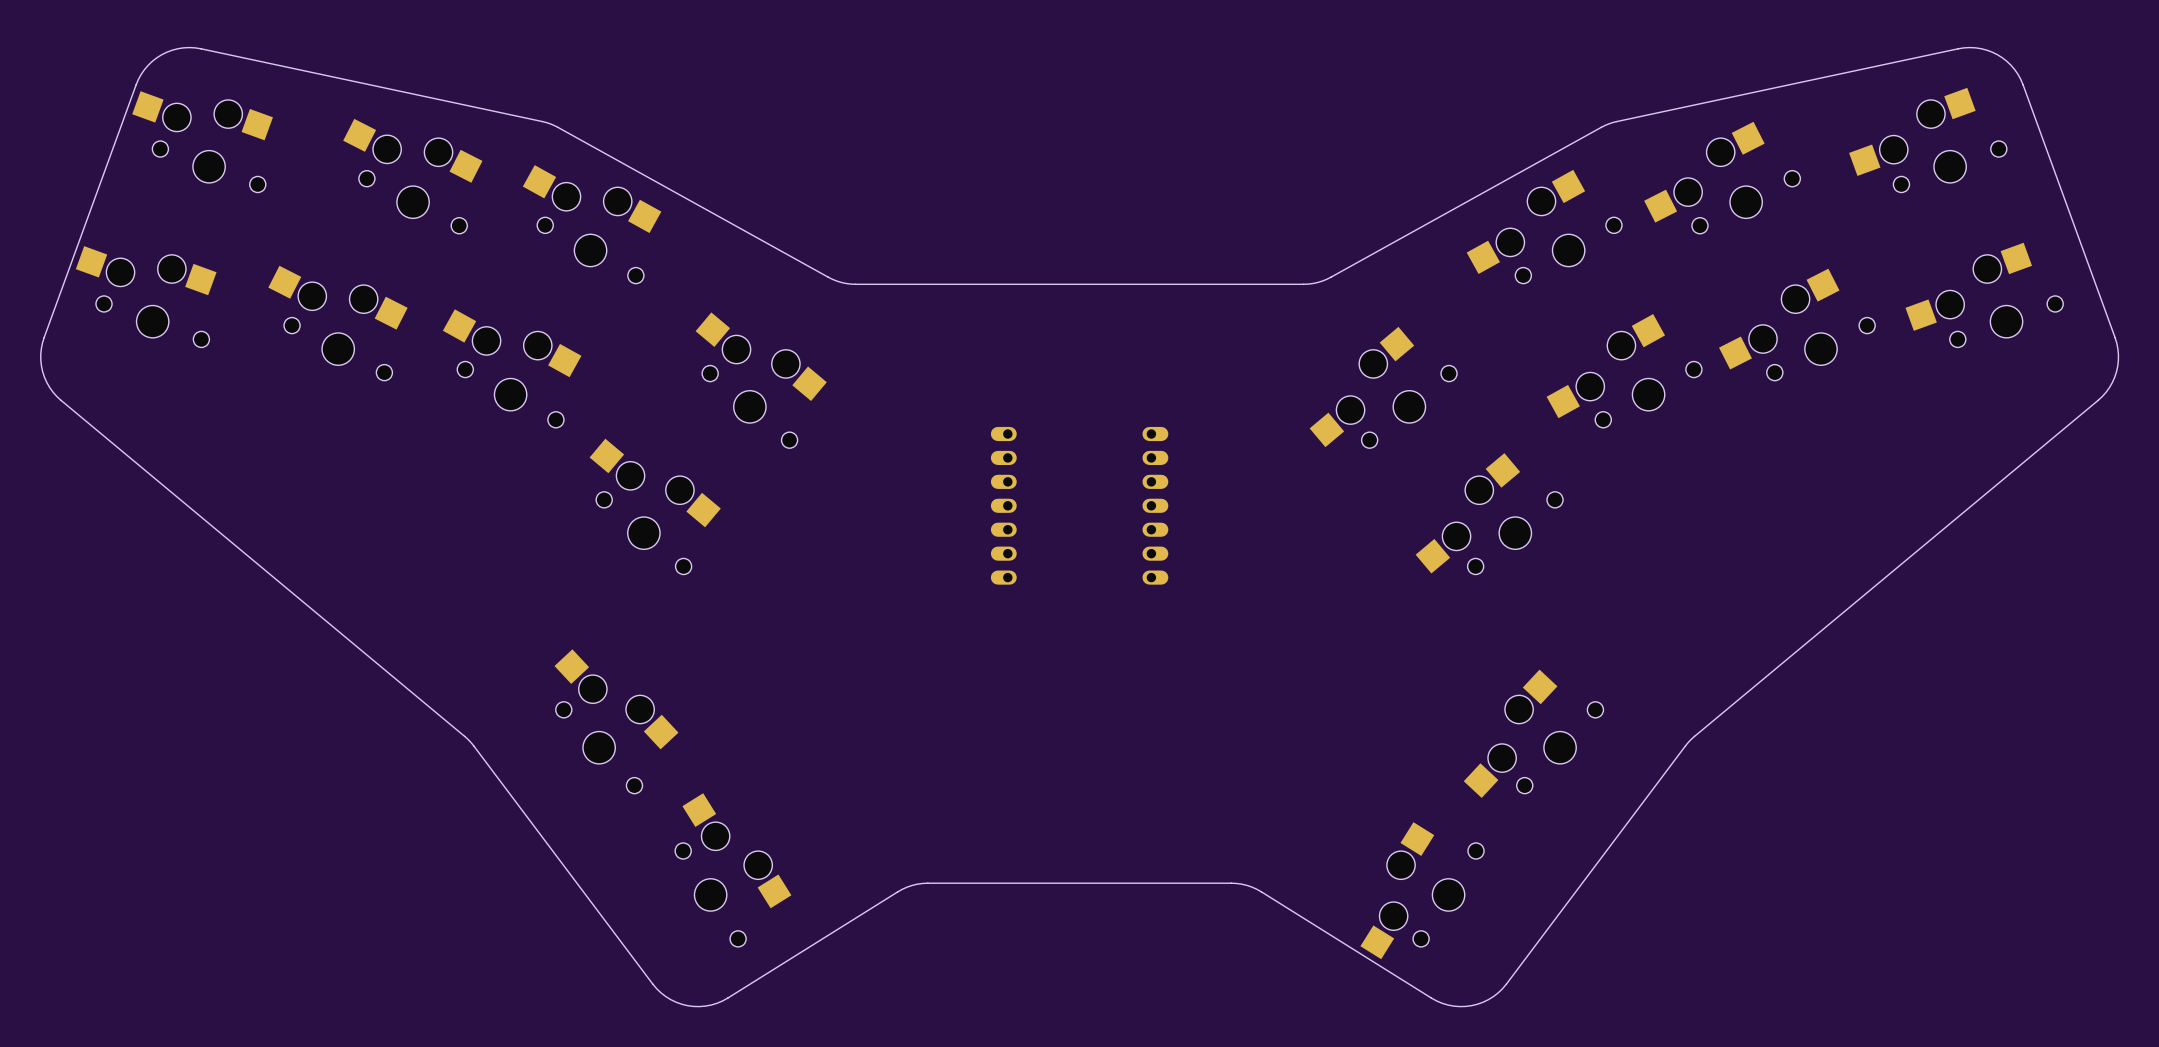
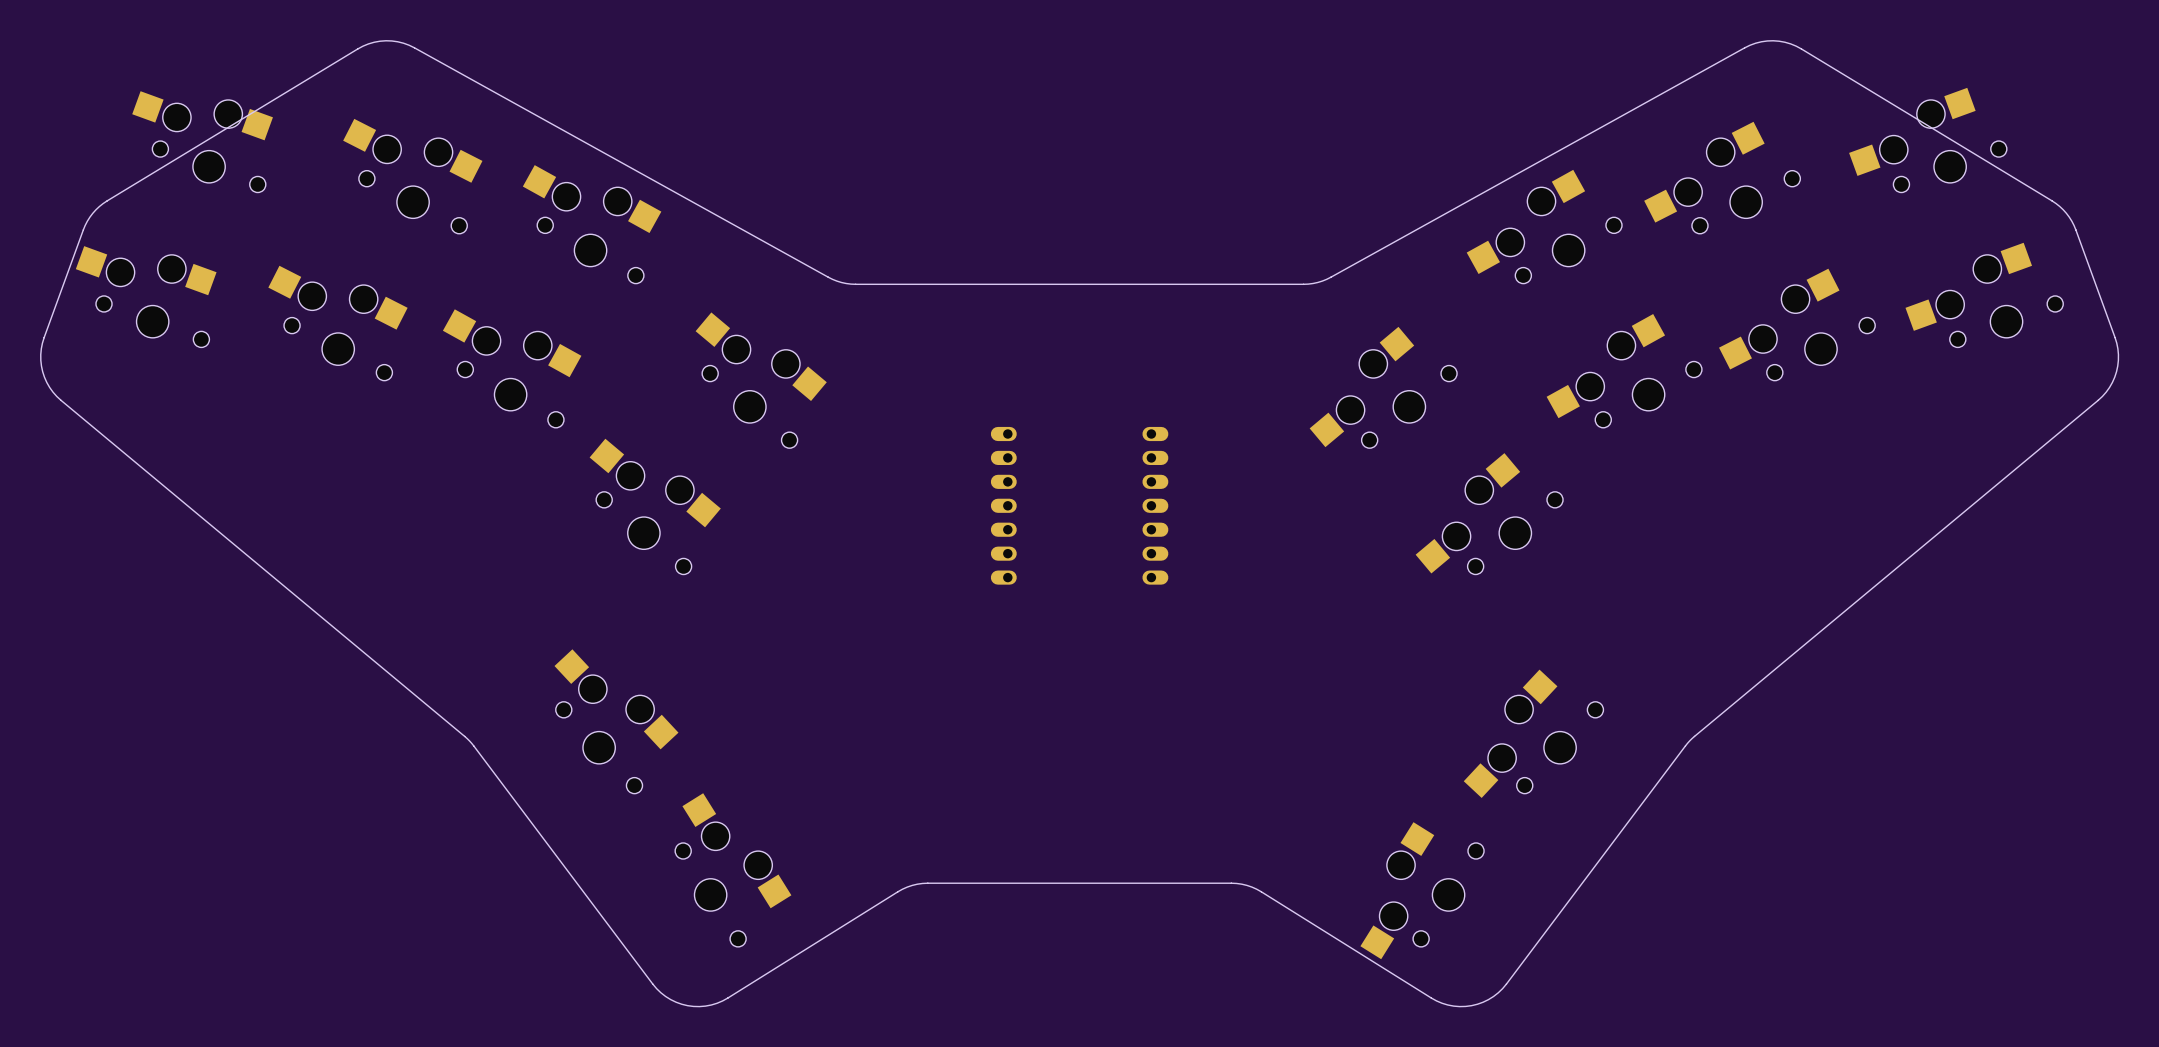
board edge: (558, 127) (542, 121) (201, 48) (178, 48) (167, 52) (152, 61) (138, 79) (83, 229) -> (558, 127) (409, 45) (391, 40) (374, 42) (357, 48) (107, 200) (92, 213) (83, 229)
board edge: (1601, 127) (1616, 121) (1958, 48) (1981, 48) (1992, 52) (2006, 61) (2020, 79) (2075, 229) -> (1601, 127) (1750, 45) (1767, 40) (1784, 42) (1801, 48) (2052, 200) (2066, 213) (2075, 229)

